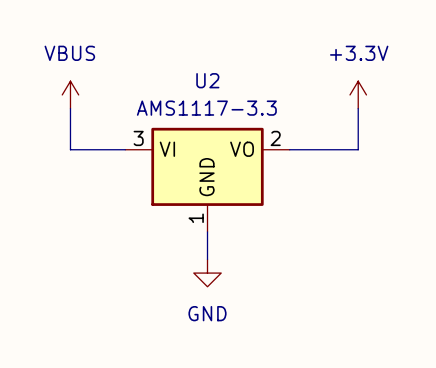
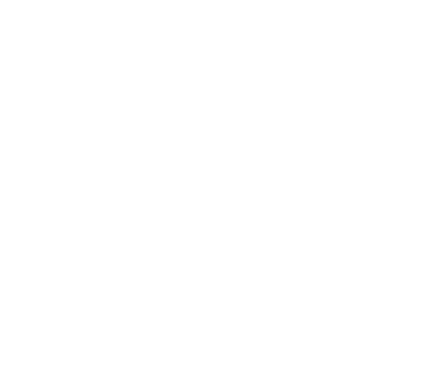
power symbol: VBUS (70, 94) -> none
power symbol: +3.3V (358, 94) -> none
wire: (70, 108) (70, 149) (125, 149) -> none
wire: (358, 108) (358, 149) (289, 149) -> none
U2: AMS1117-3.3 (207, 179) -> none
wire: (207, 231) (207, 259) -> none
power symbol: GND (207, 273) -> none

